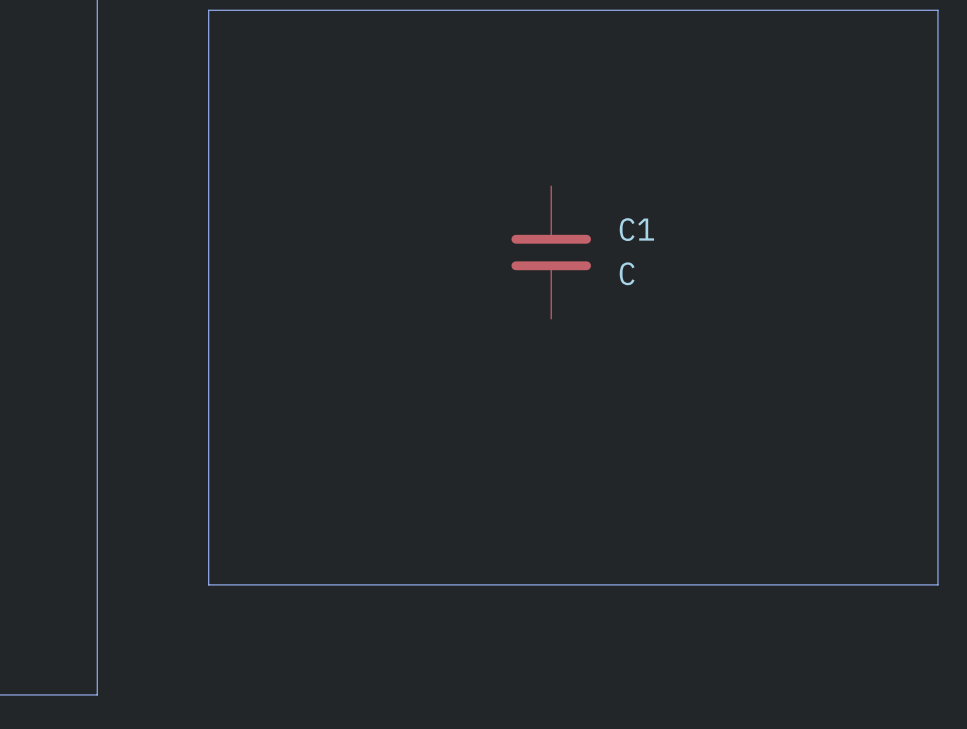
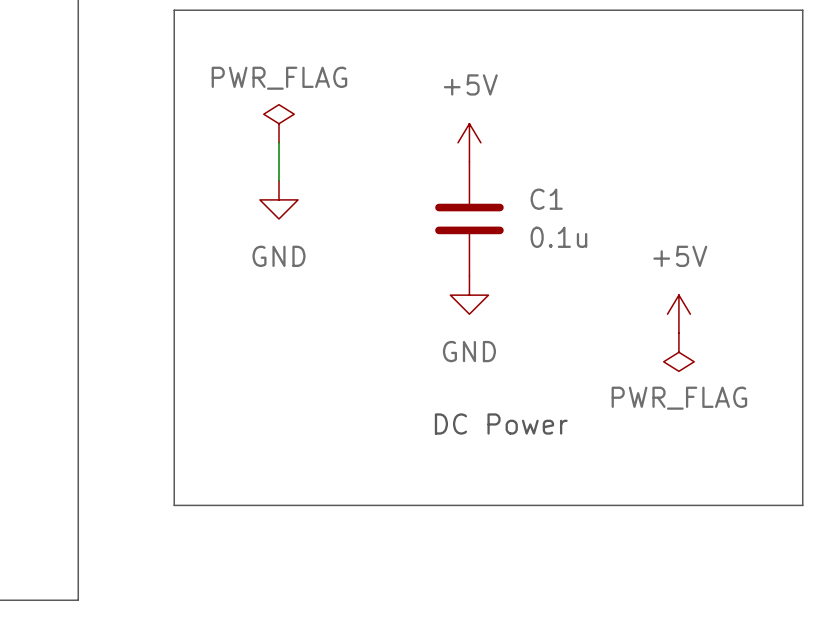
power symbol: none -> PWR_FLAG (278, 123)
wire: none -> (278, 142) (278, 180)
power symbol: none -> +5V (469, 142)
power symbol: none -> GND (278, 199)
C1 value: C (627, 273) -> 0.1u (558, 237)
power symbol: none -> GND (469, 295)
power symbol: none -> +5V (678, 314)
power symbol: none -> PWR_FLAG (678, 352)
text: none -> DC Power (501, 424)

